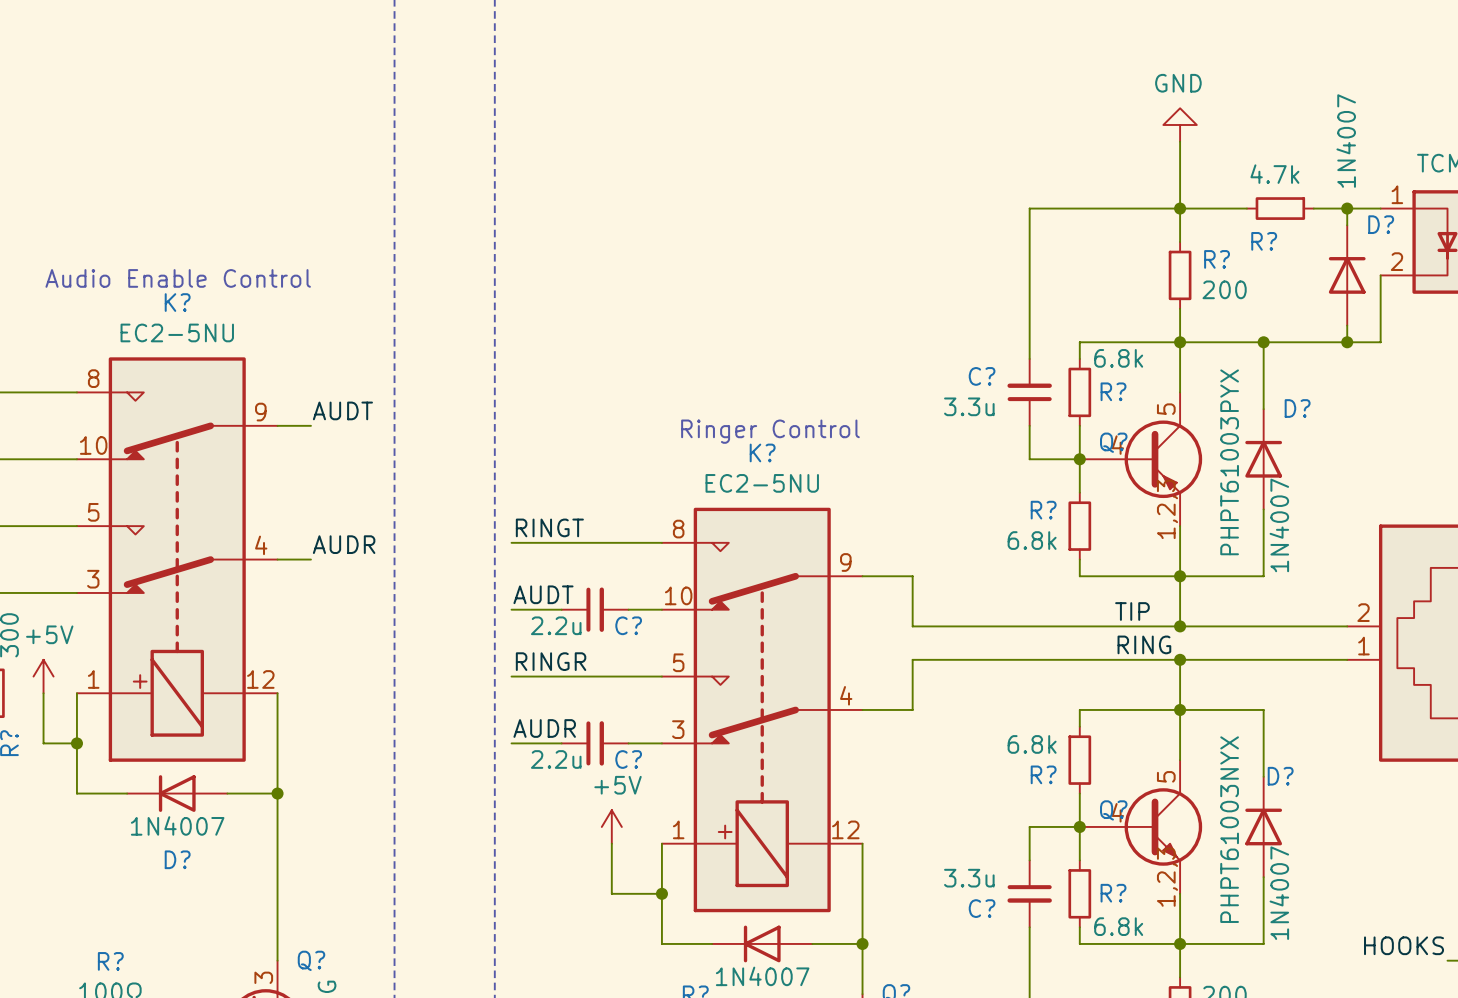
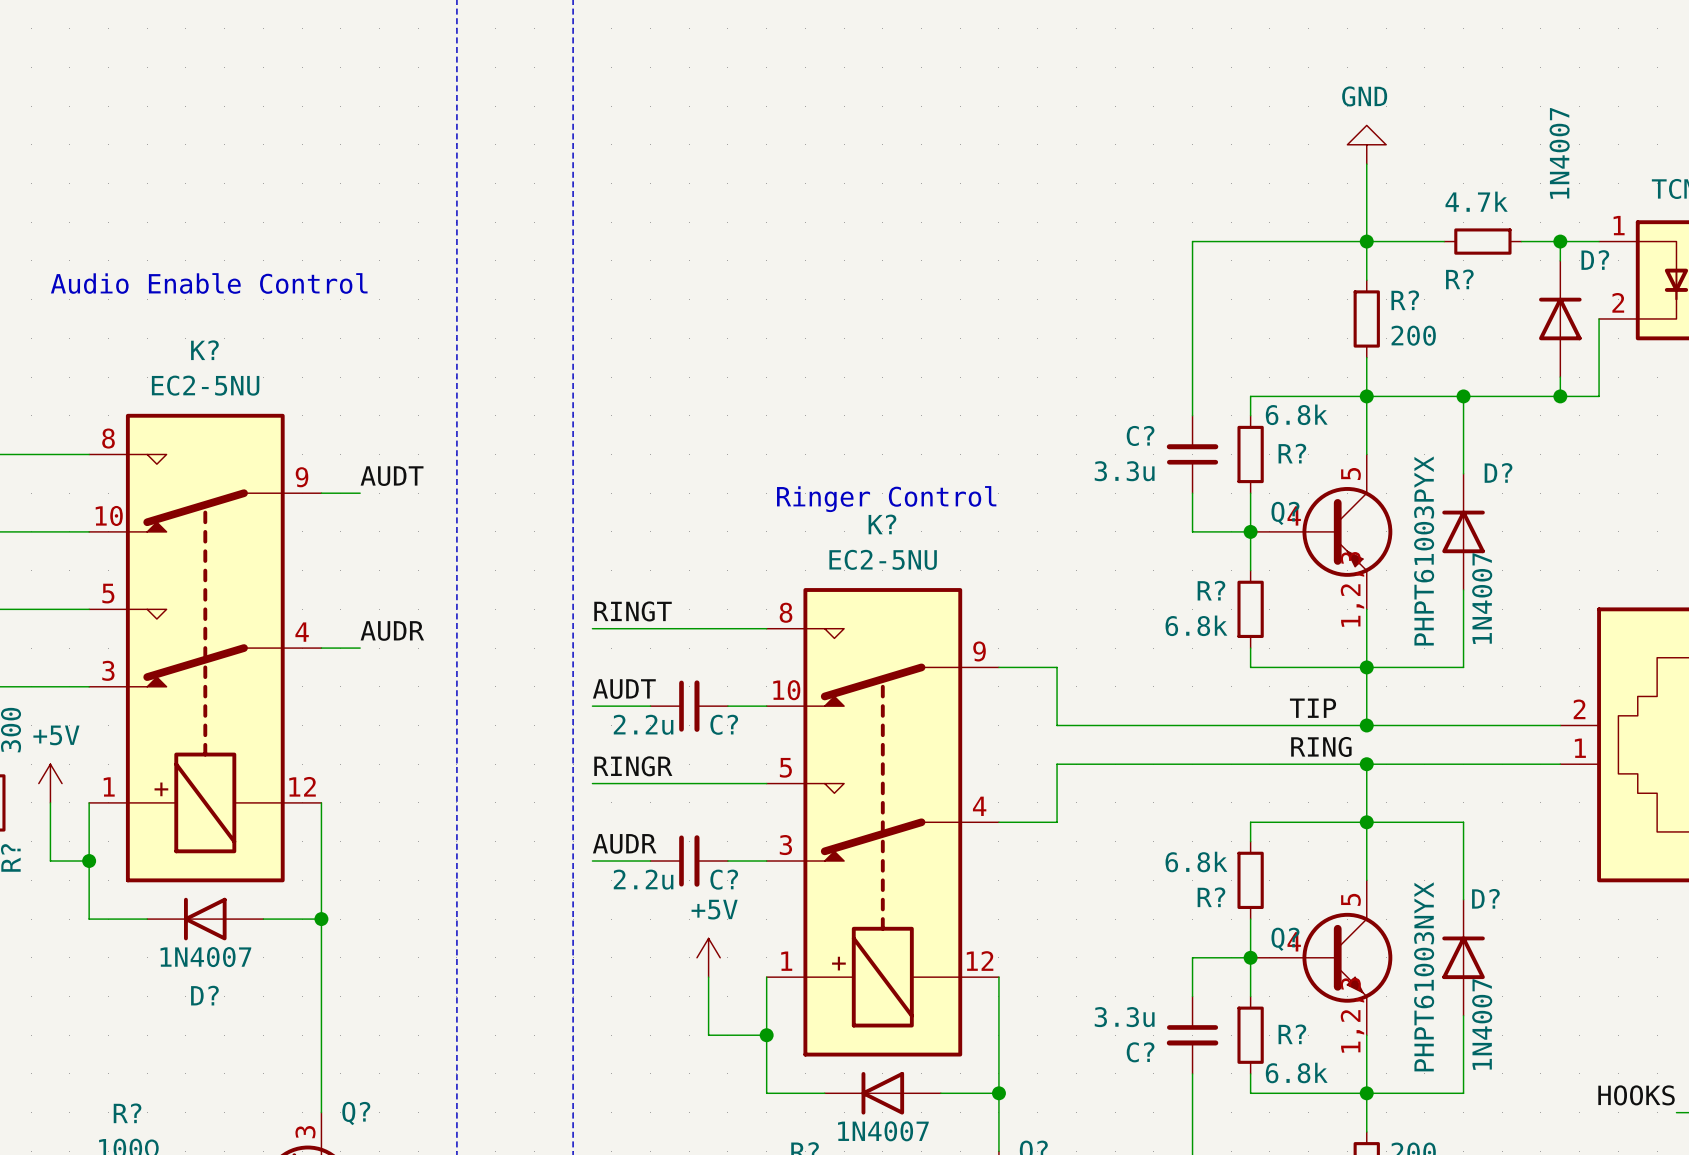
text position: Audio Enable Control (178, 278) -> Audio Enable Control (209, 283)

